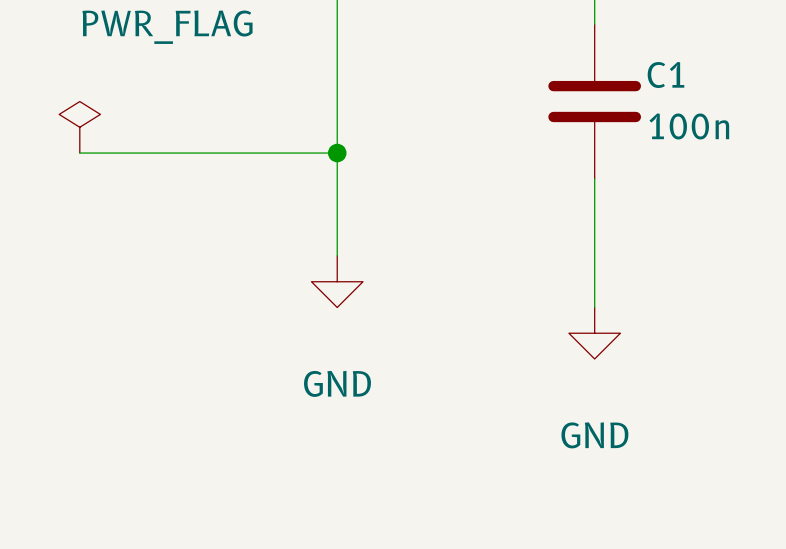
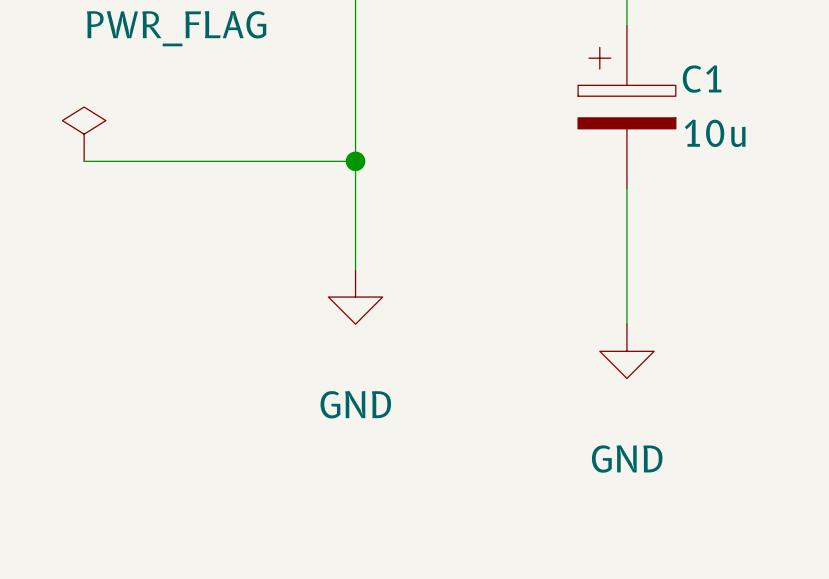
C1 symbol: [548, 24, 642, 179] -> [578, 25, 676, 189]
C1 value: 100n (689, 126) -> 10u (715, 133)

